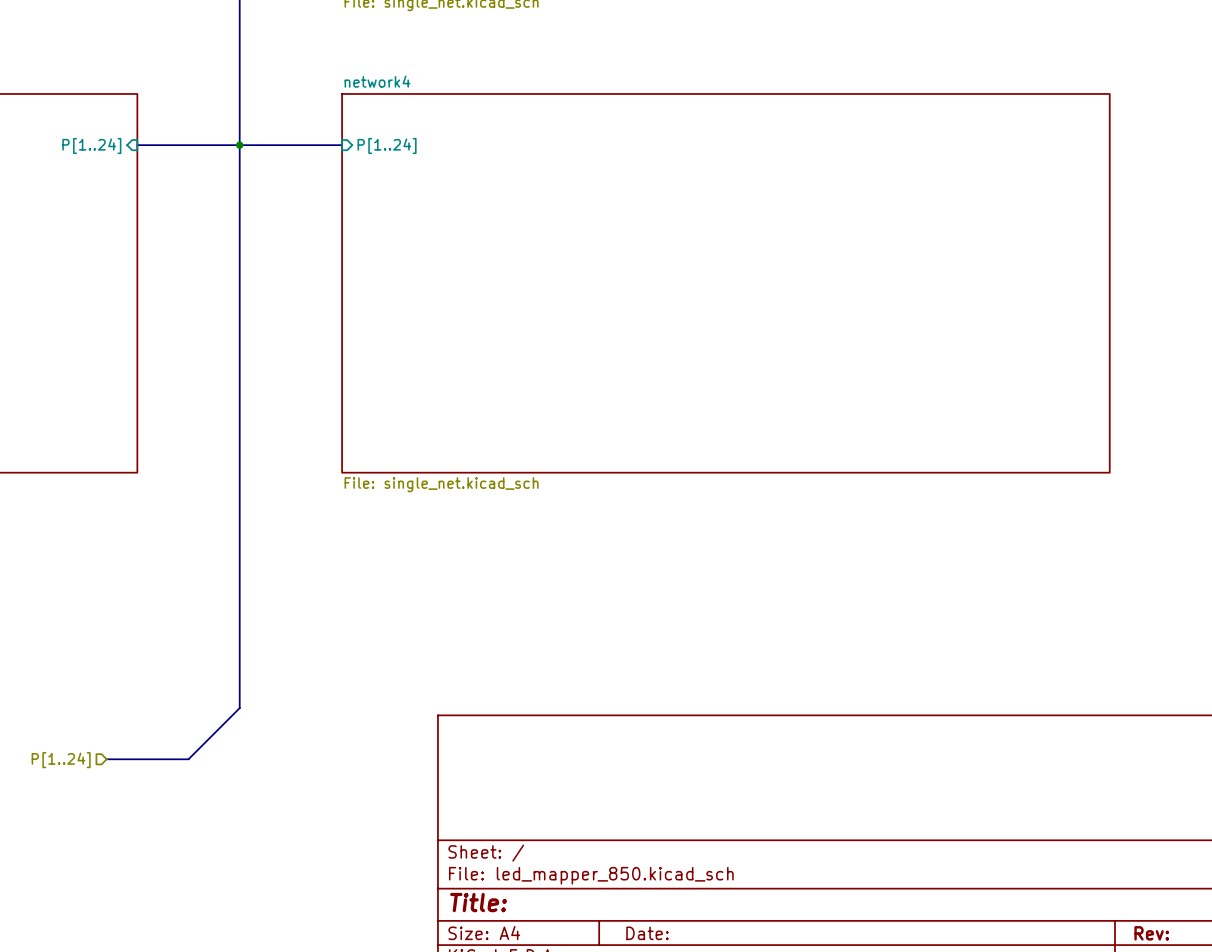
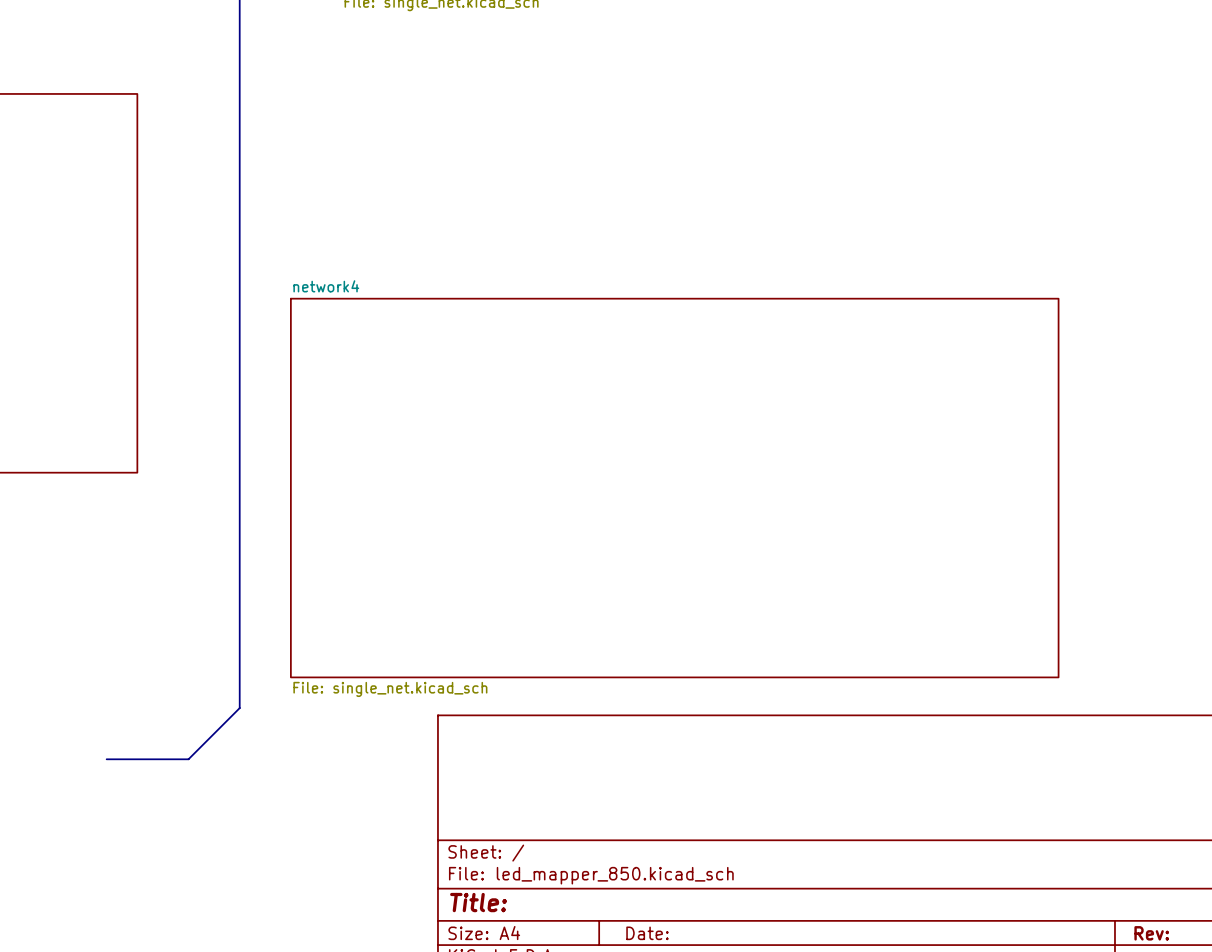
sheet pin: P[1..24] (91, 145) -> none
bus: (137, 145) (342, 145) -> none
junction: (239, 145) -> none
sheet pin: P[1..24] (387, 145) -> none
sheet network4 position: (725, 283) -> (674, 488)
hierarchical label: P[1..24] (61, 760) -> none

